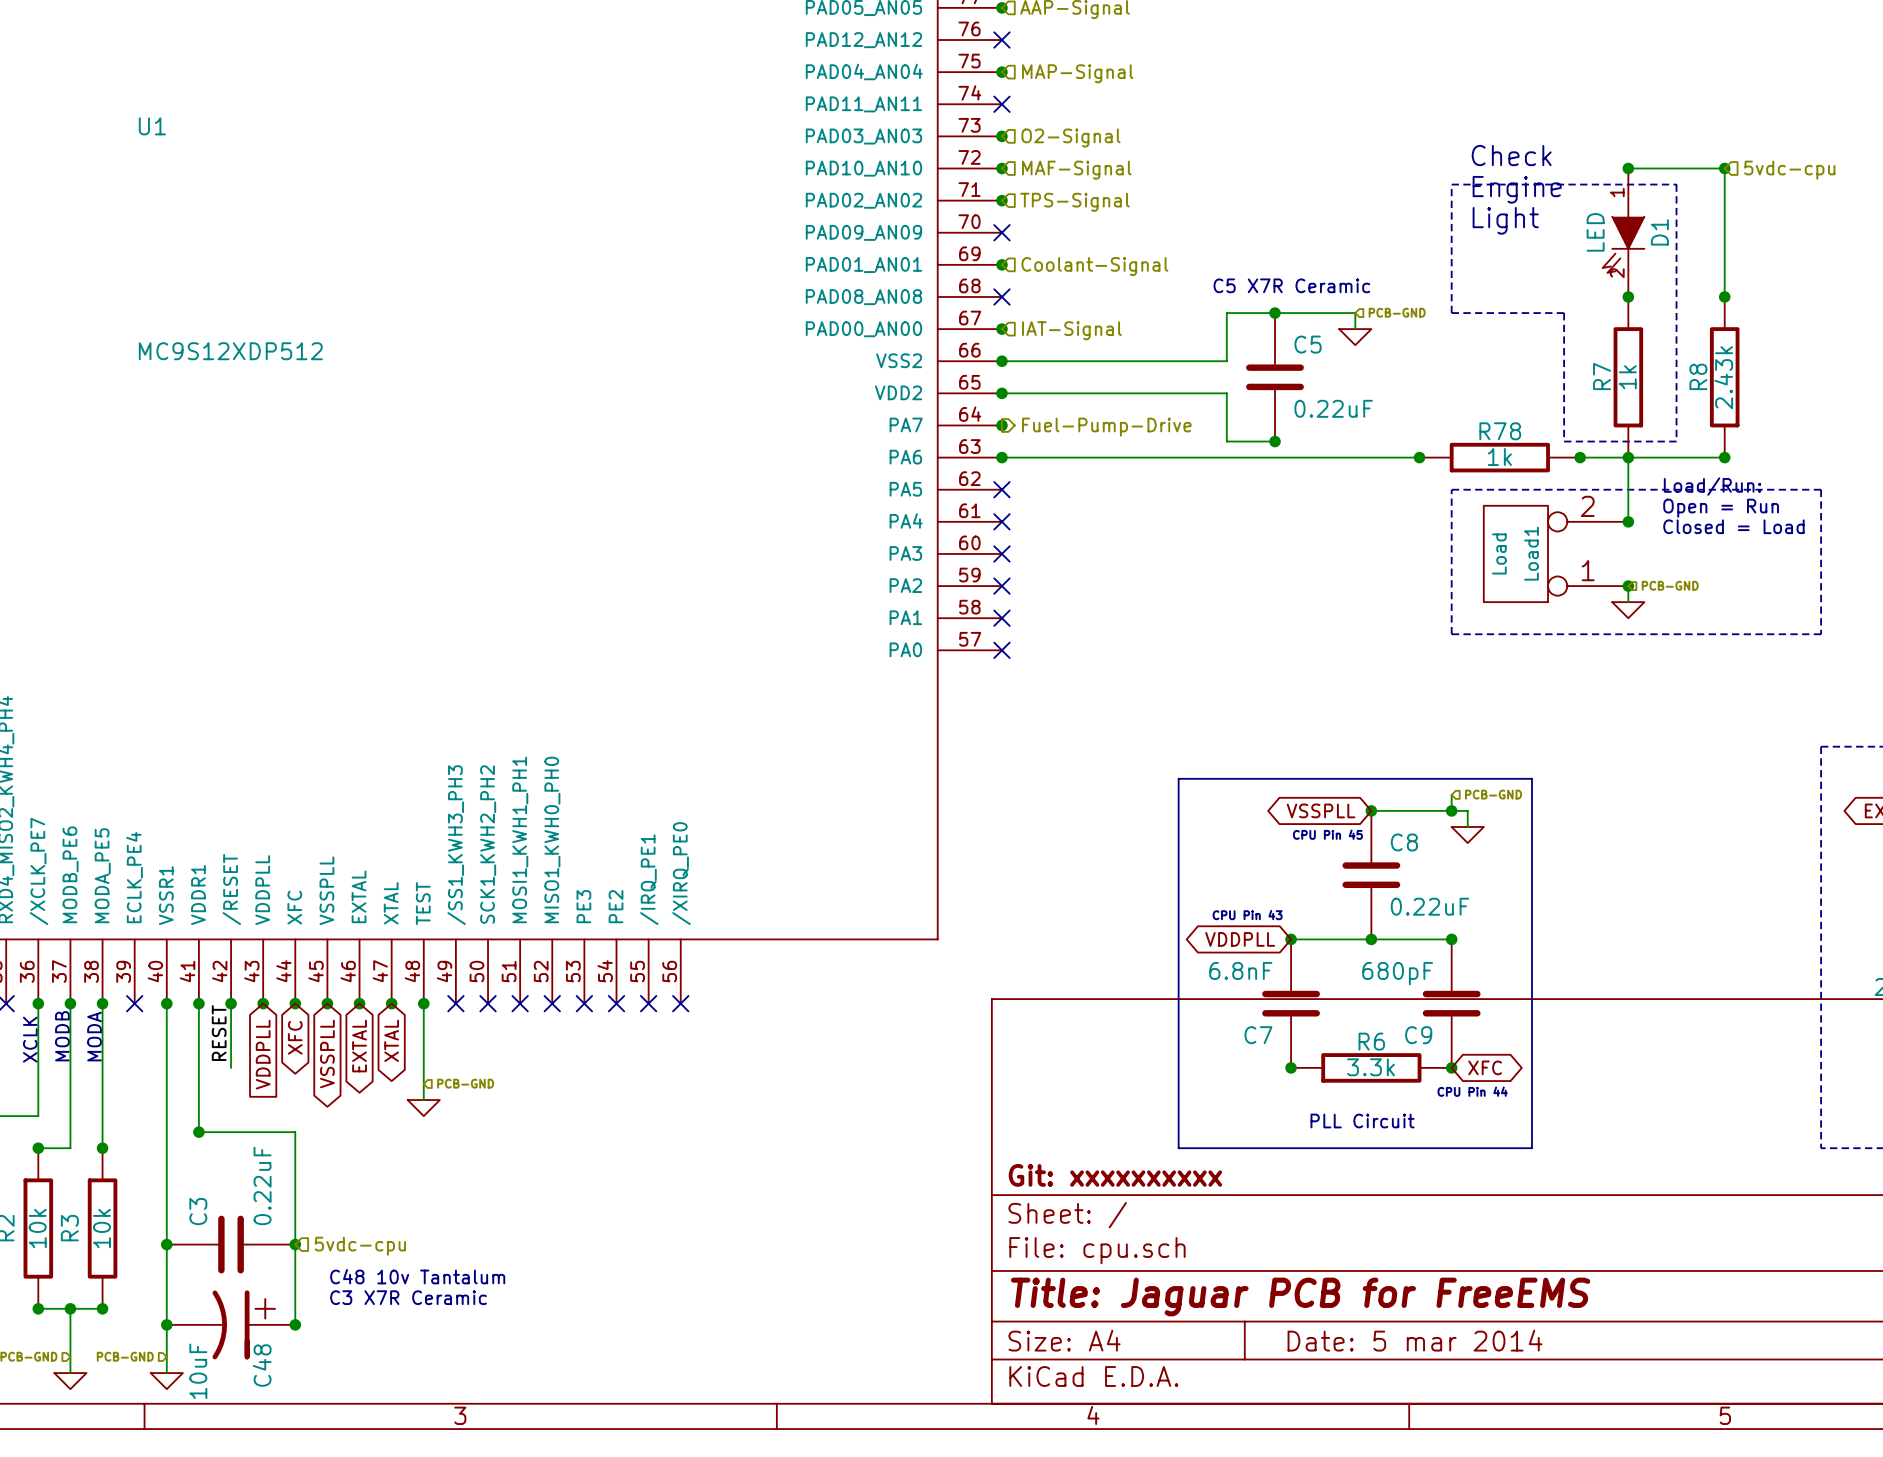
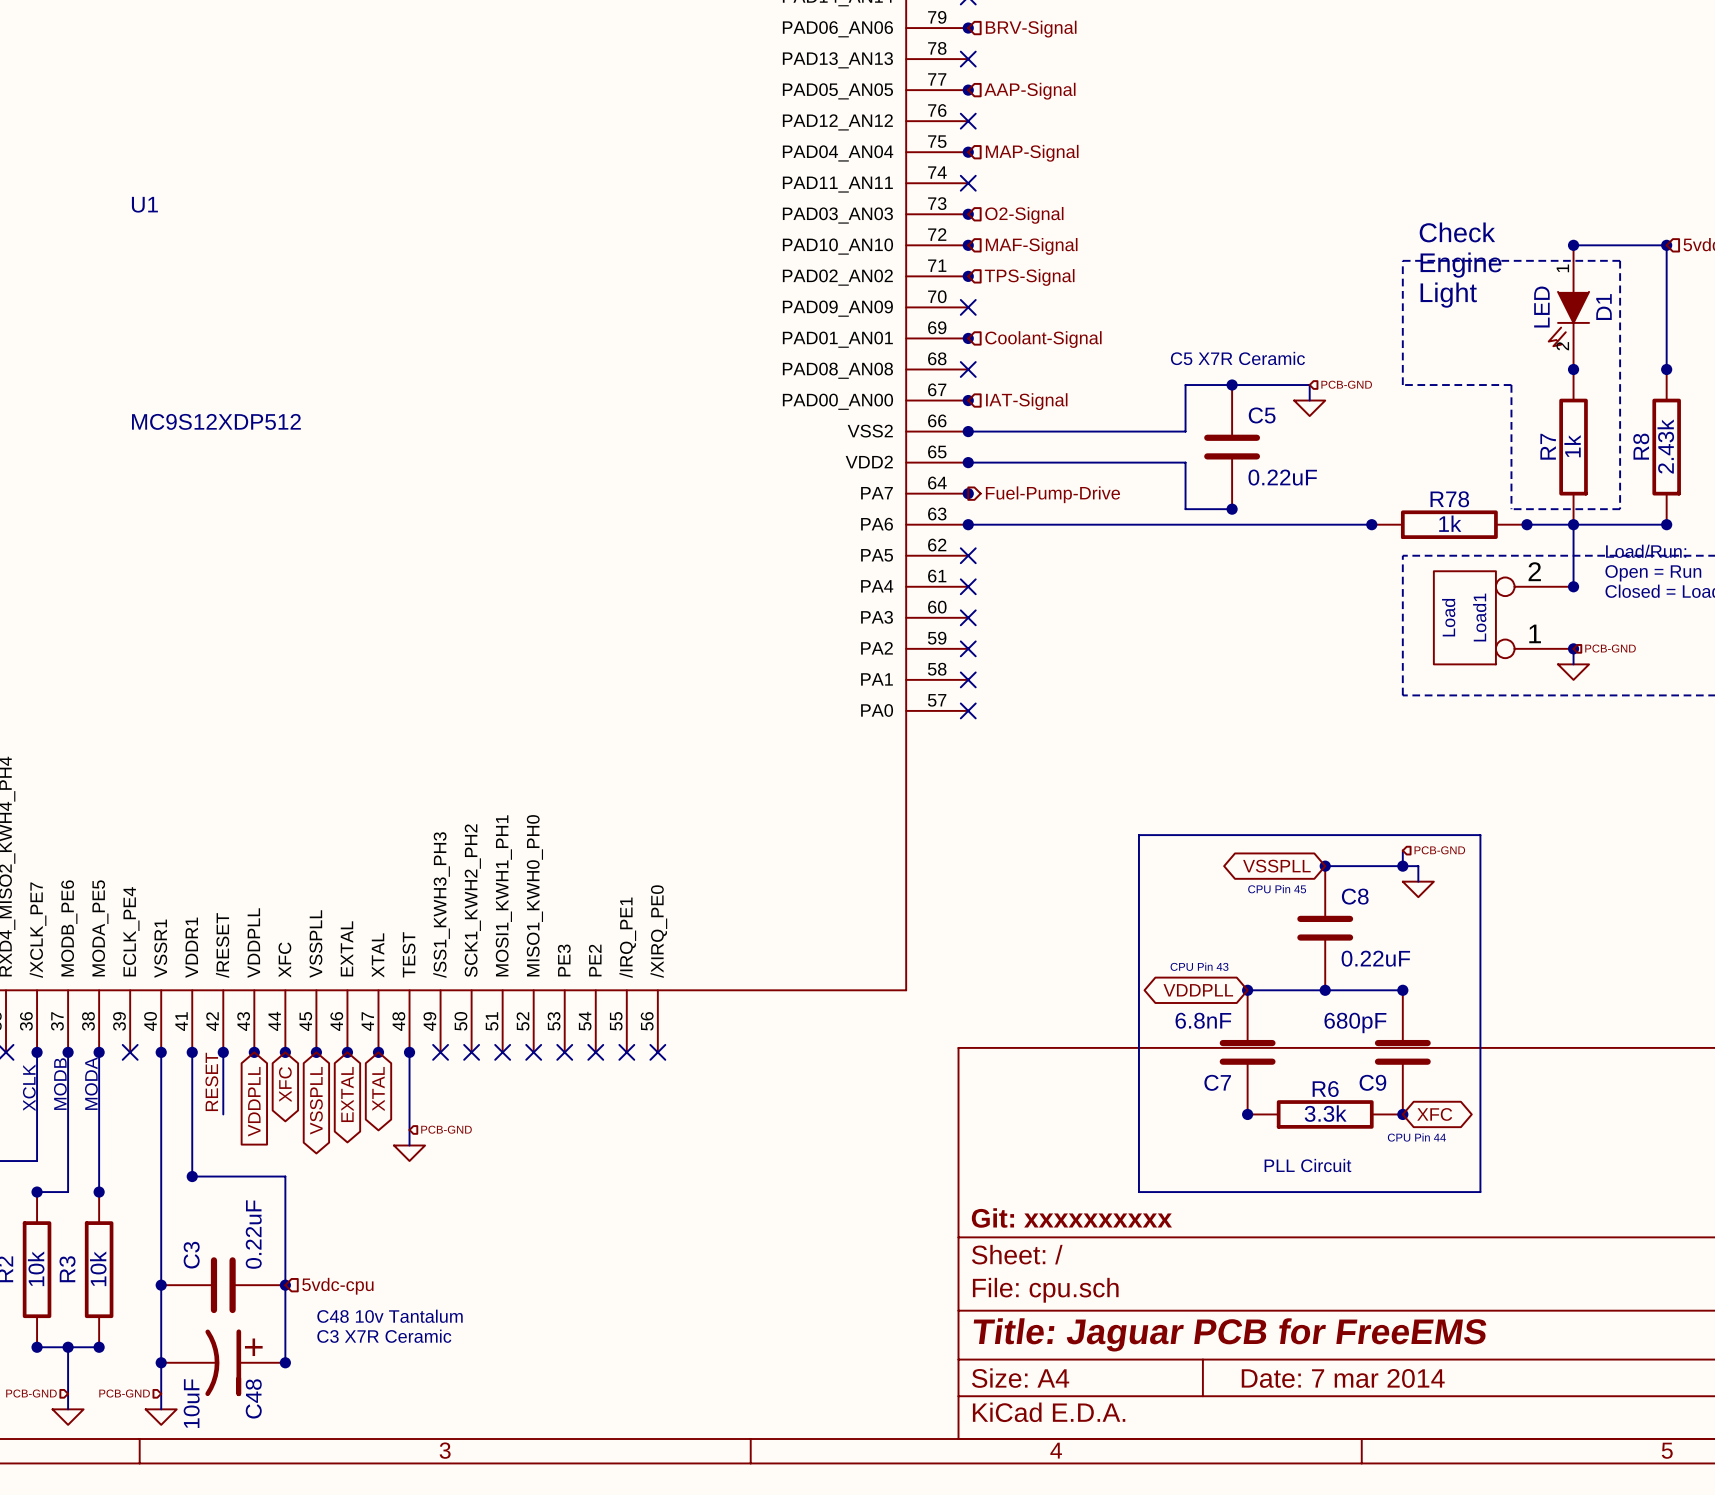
title block: Date: 5 mar 2014 (1414, 1340) -> Date: 7 mar 2014 (1343, 1378)

